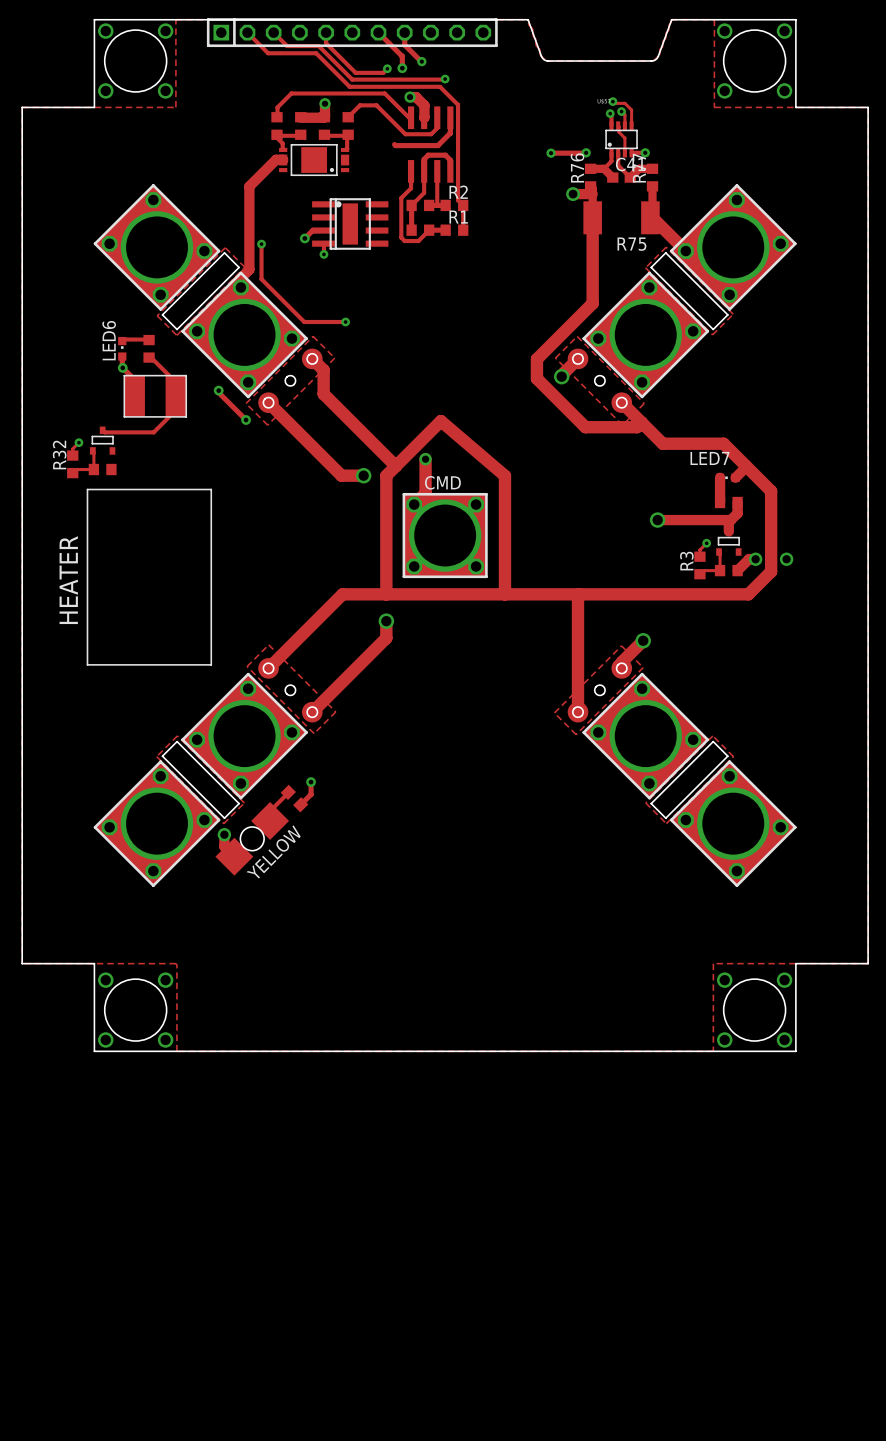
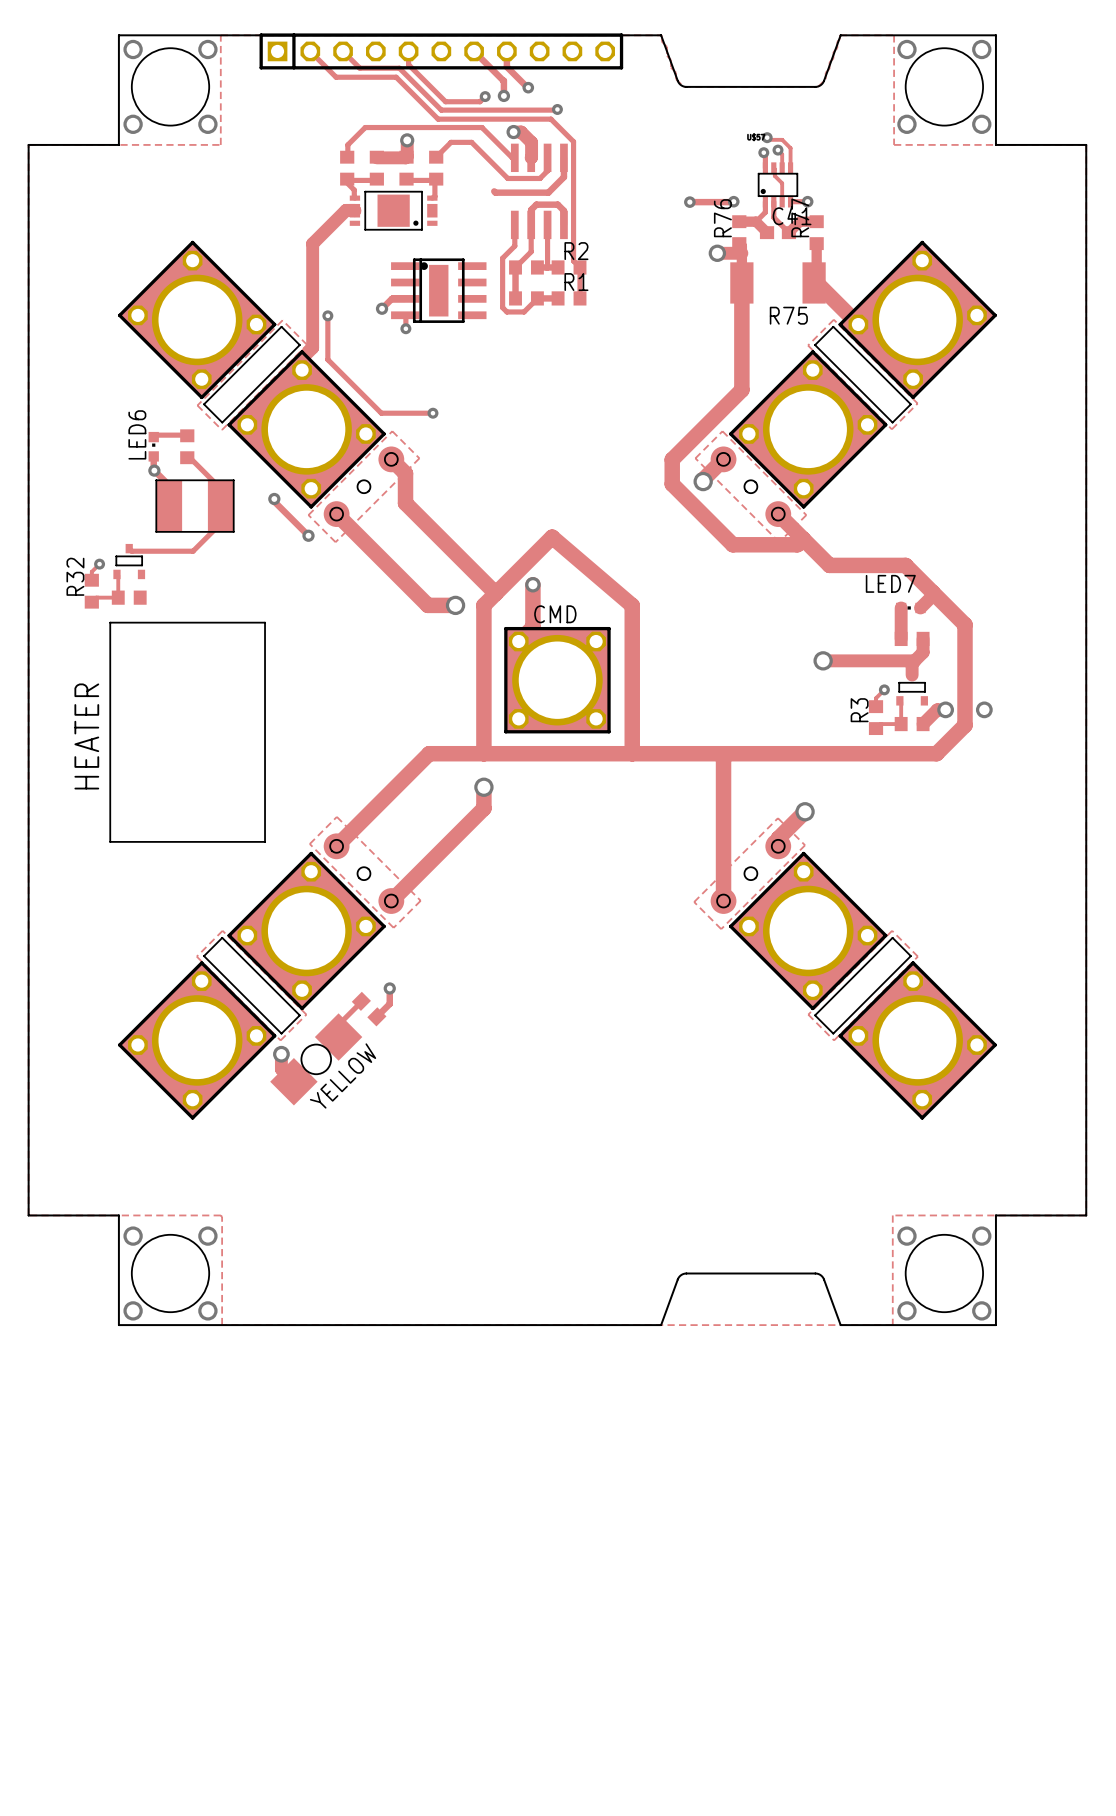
board edge: (528, 1051) (671, 1051) -> (661, 1325) (678, 1278) (686, 1273) (818, 1274) (824, 1279) (840, 1325)

